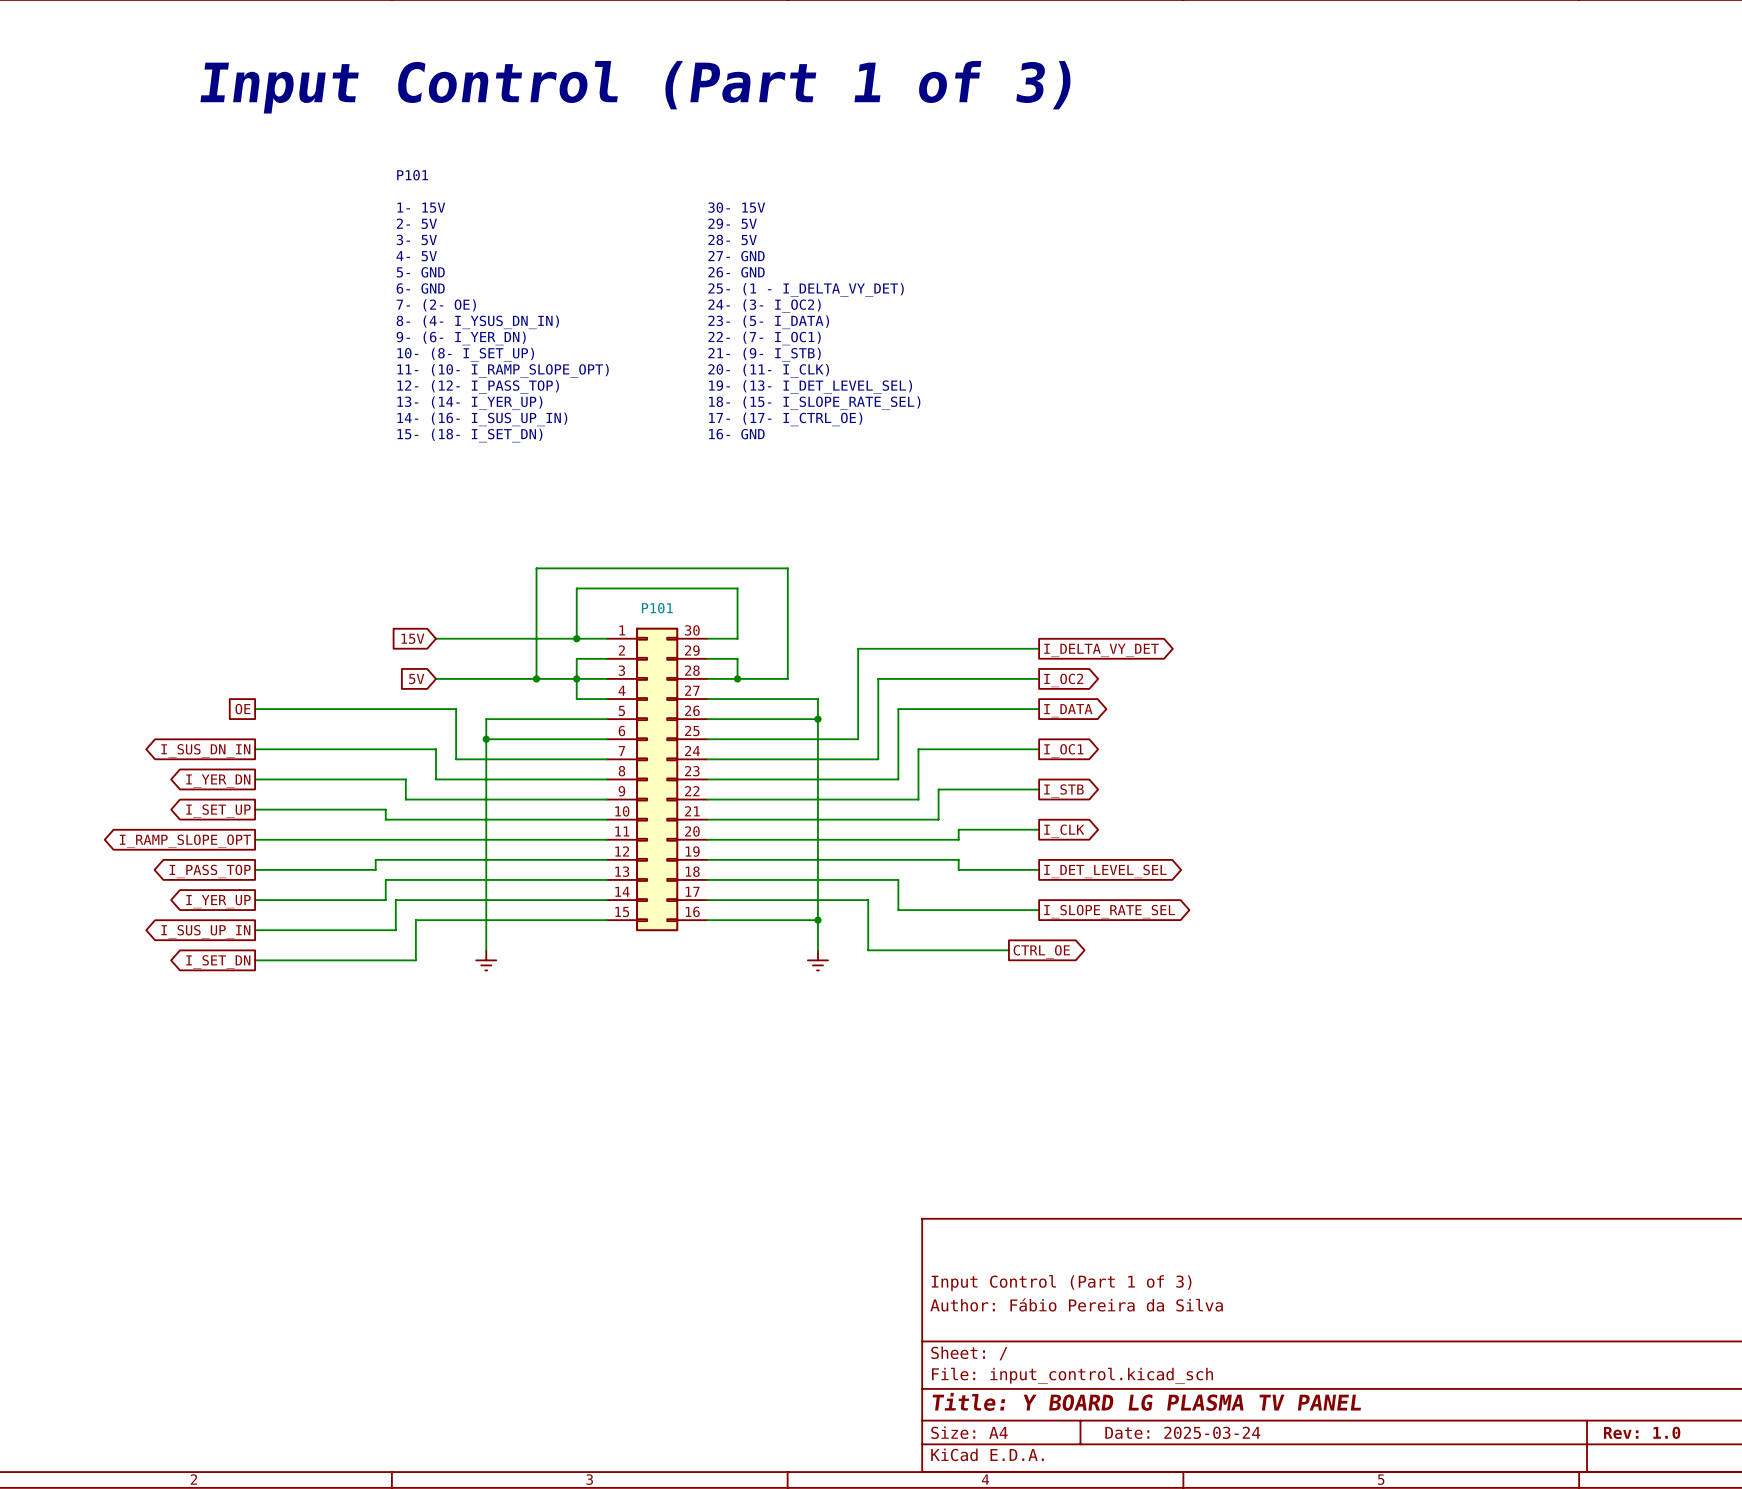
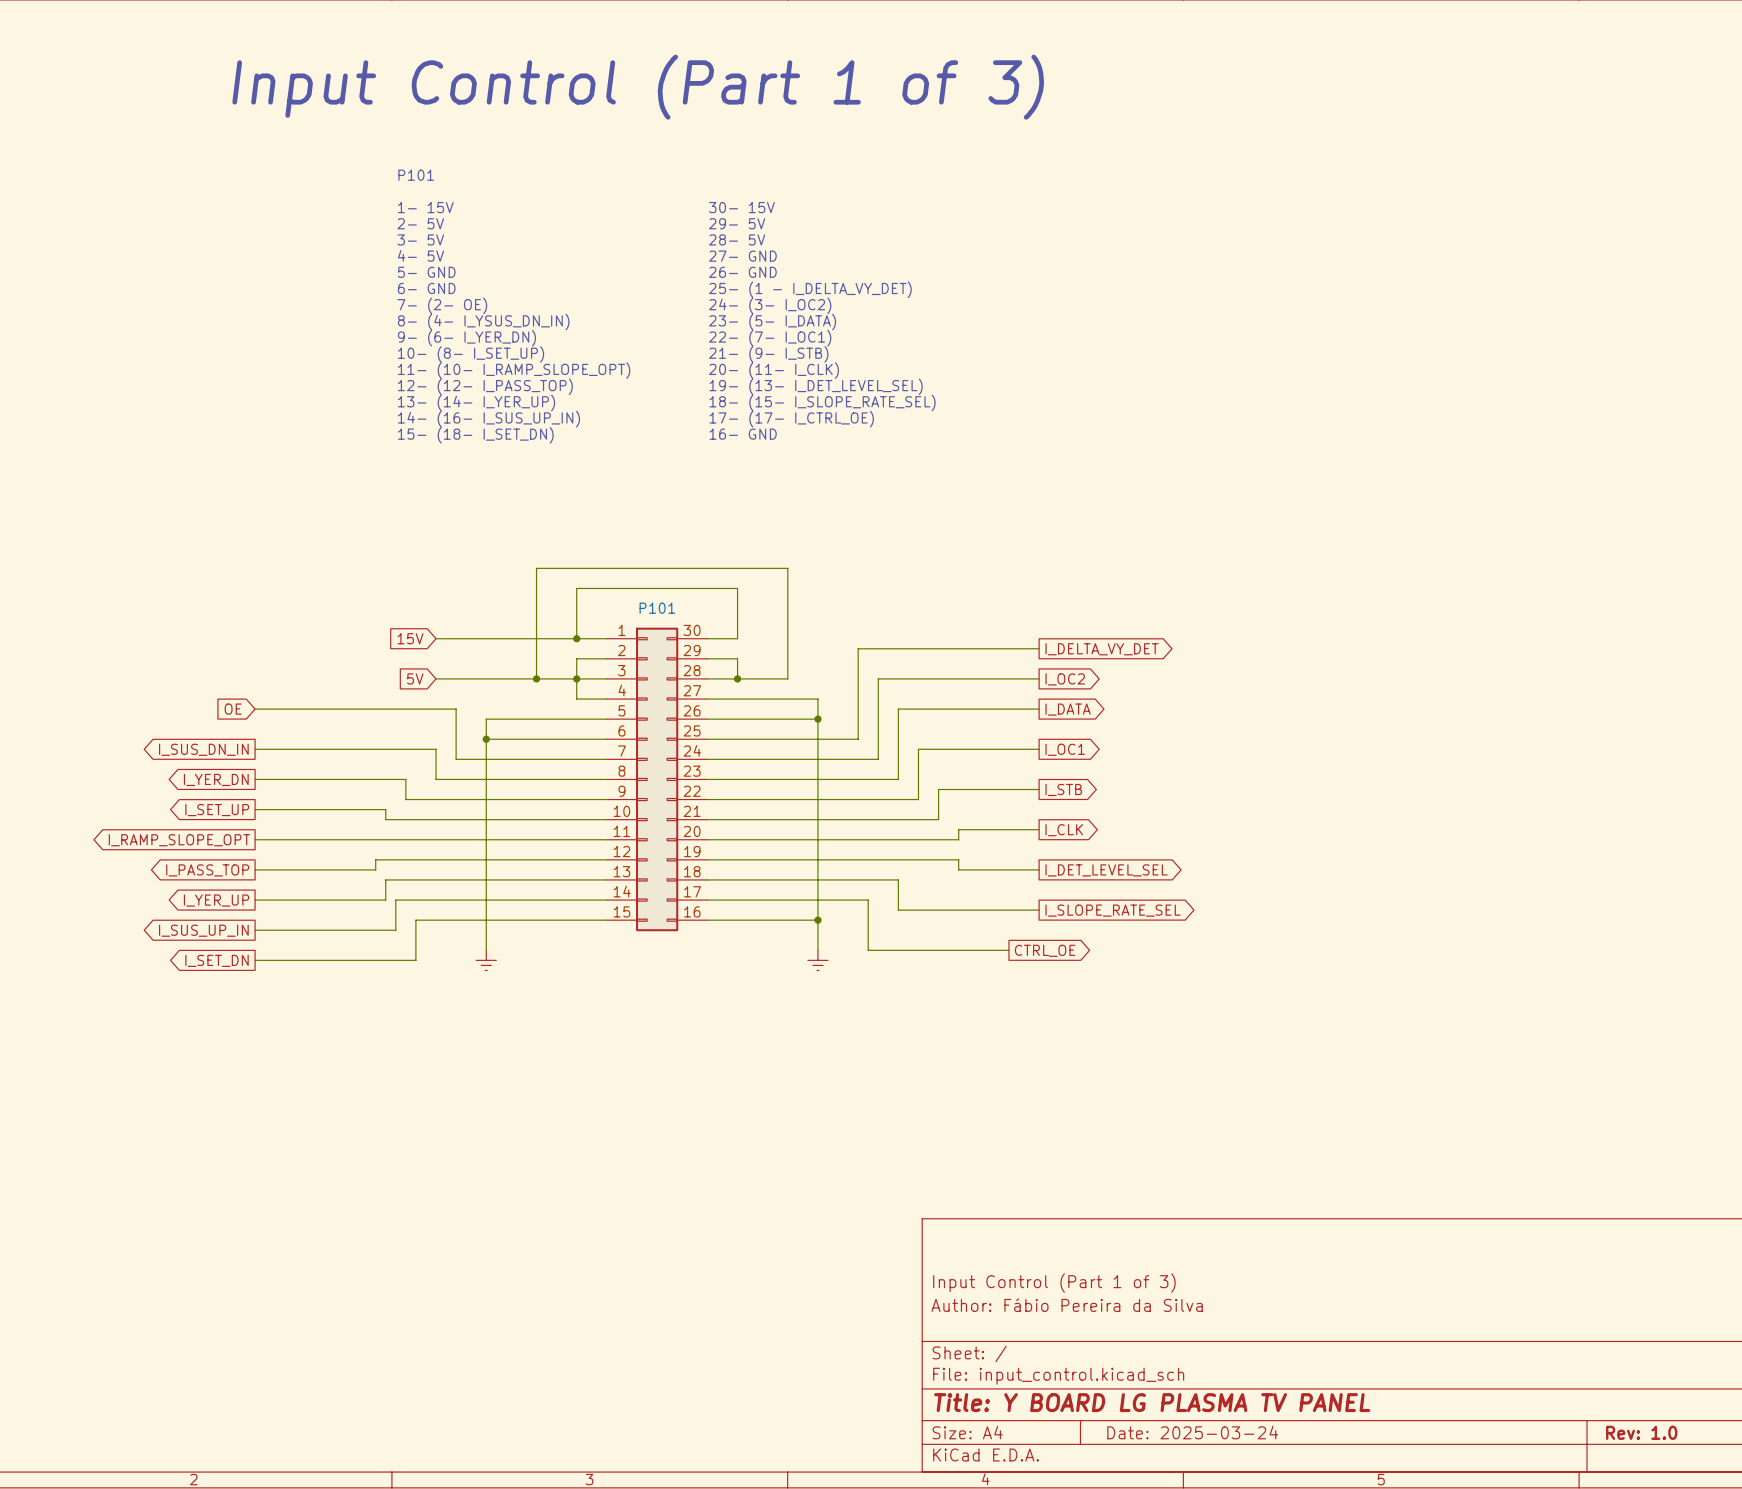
global label shape: passive (242, 709) -> input (233, 709)

